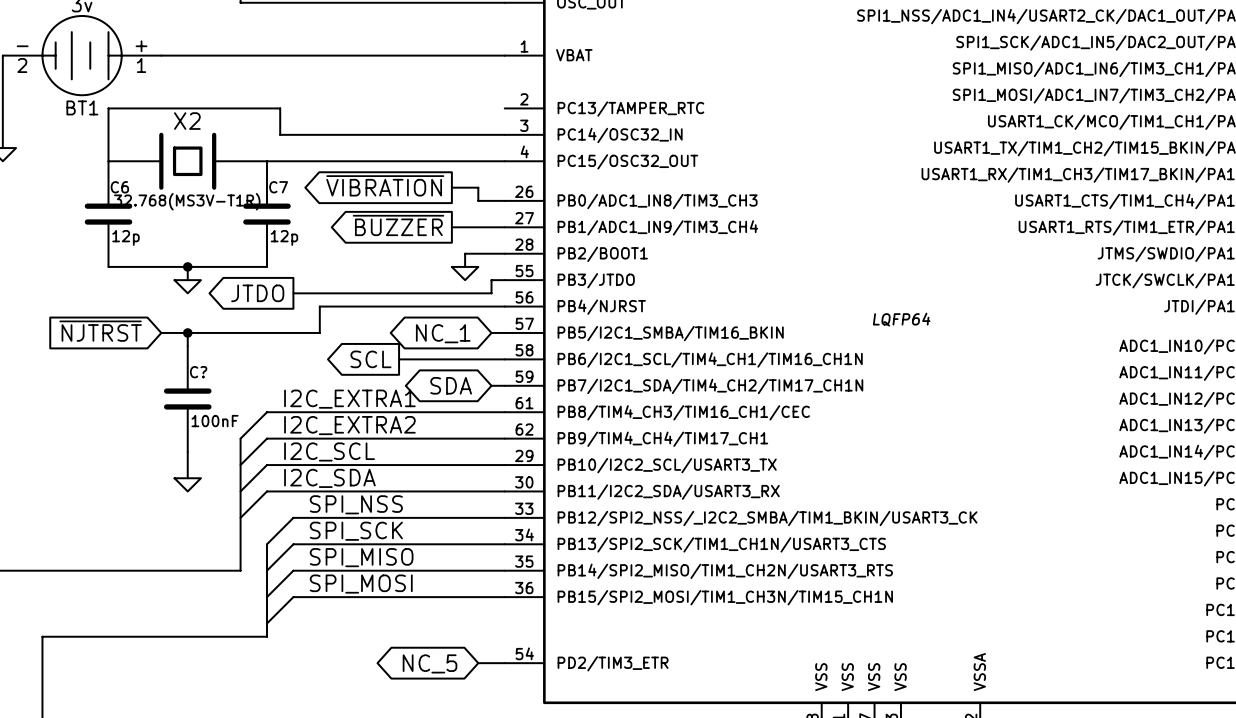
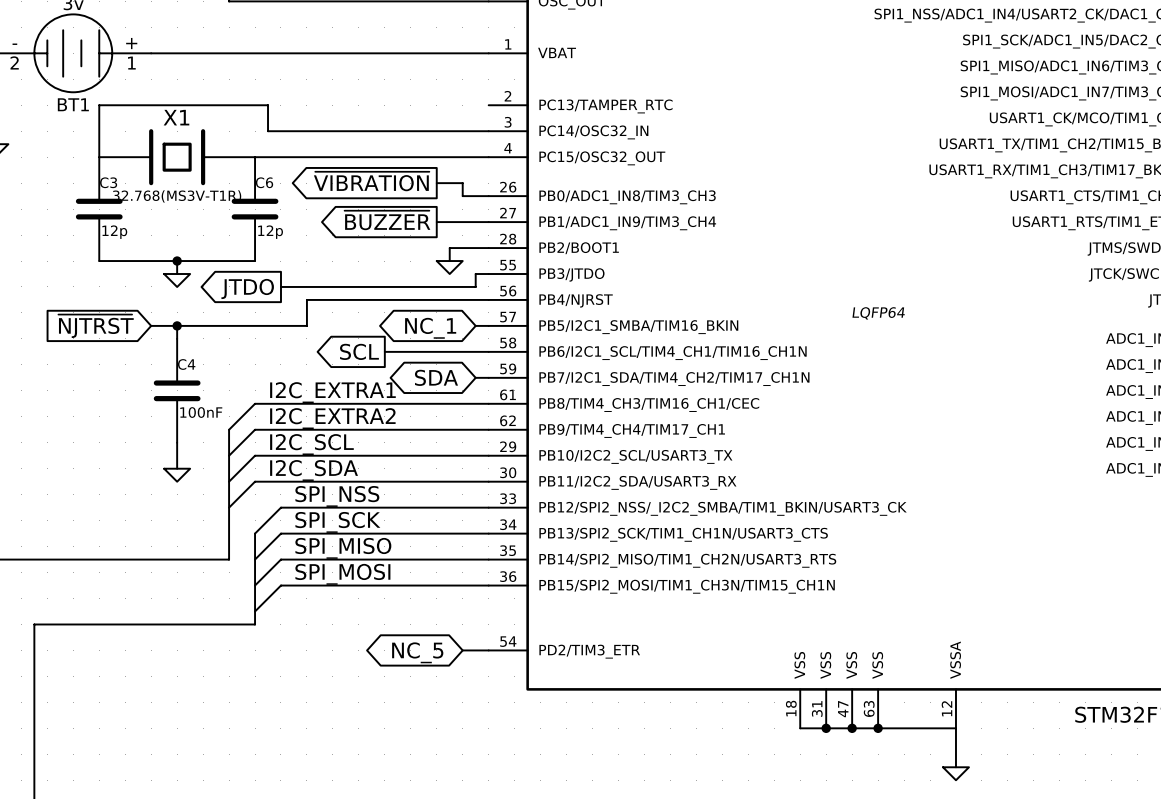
X2 name: X2 (187, 121) -> X1 (176, 117)
C6 name: C6 (119, 187) -> C3 (108, 182)
C7 name: C7 (278, 187) -> C6 (264, 182)
C? name: C? (198, 372) -> C4 (186, 364)

